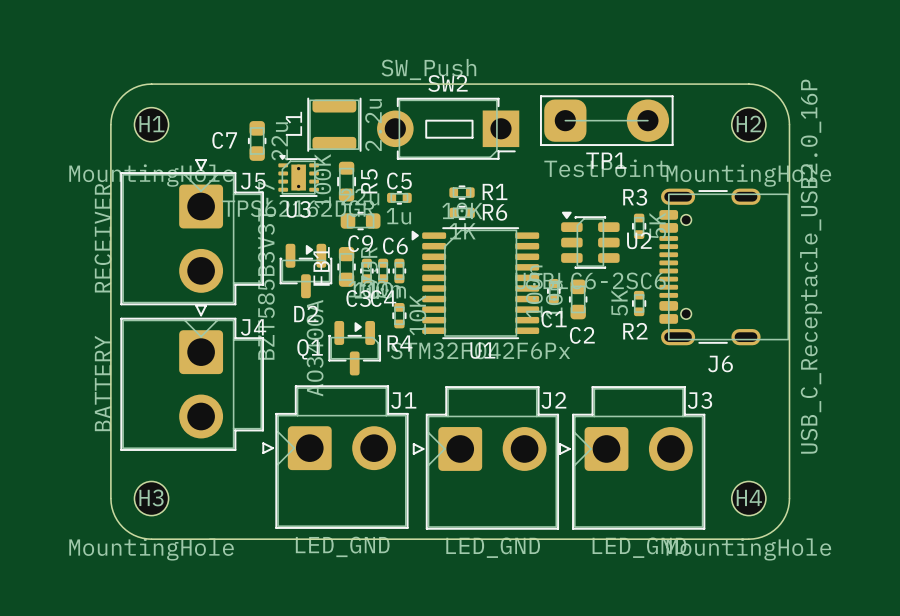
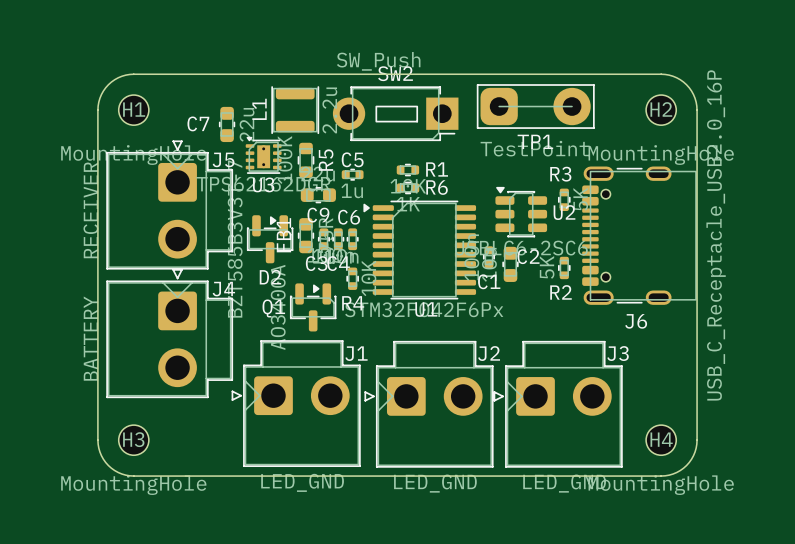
C2 name position: C2 (582, 335) -> C2 (528, 256)

